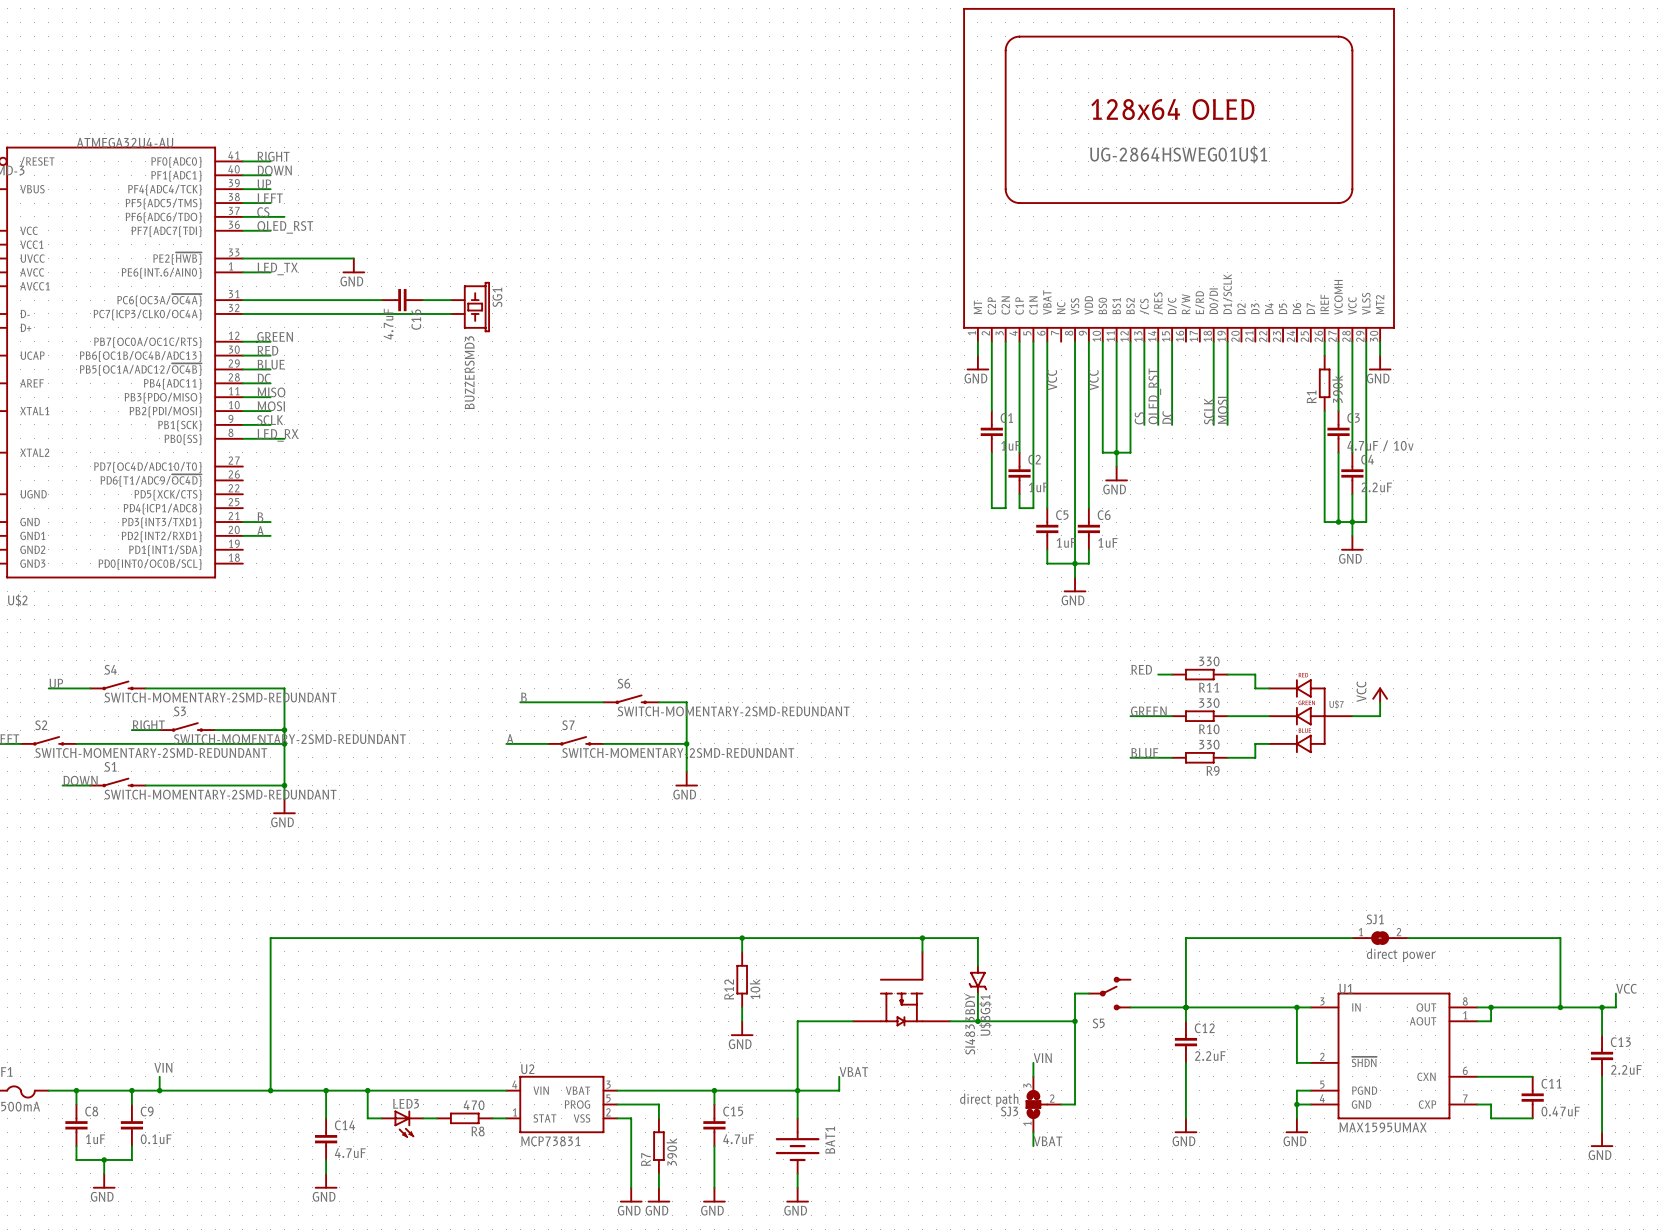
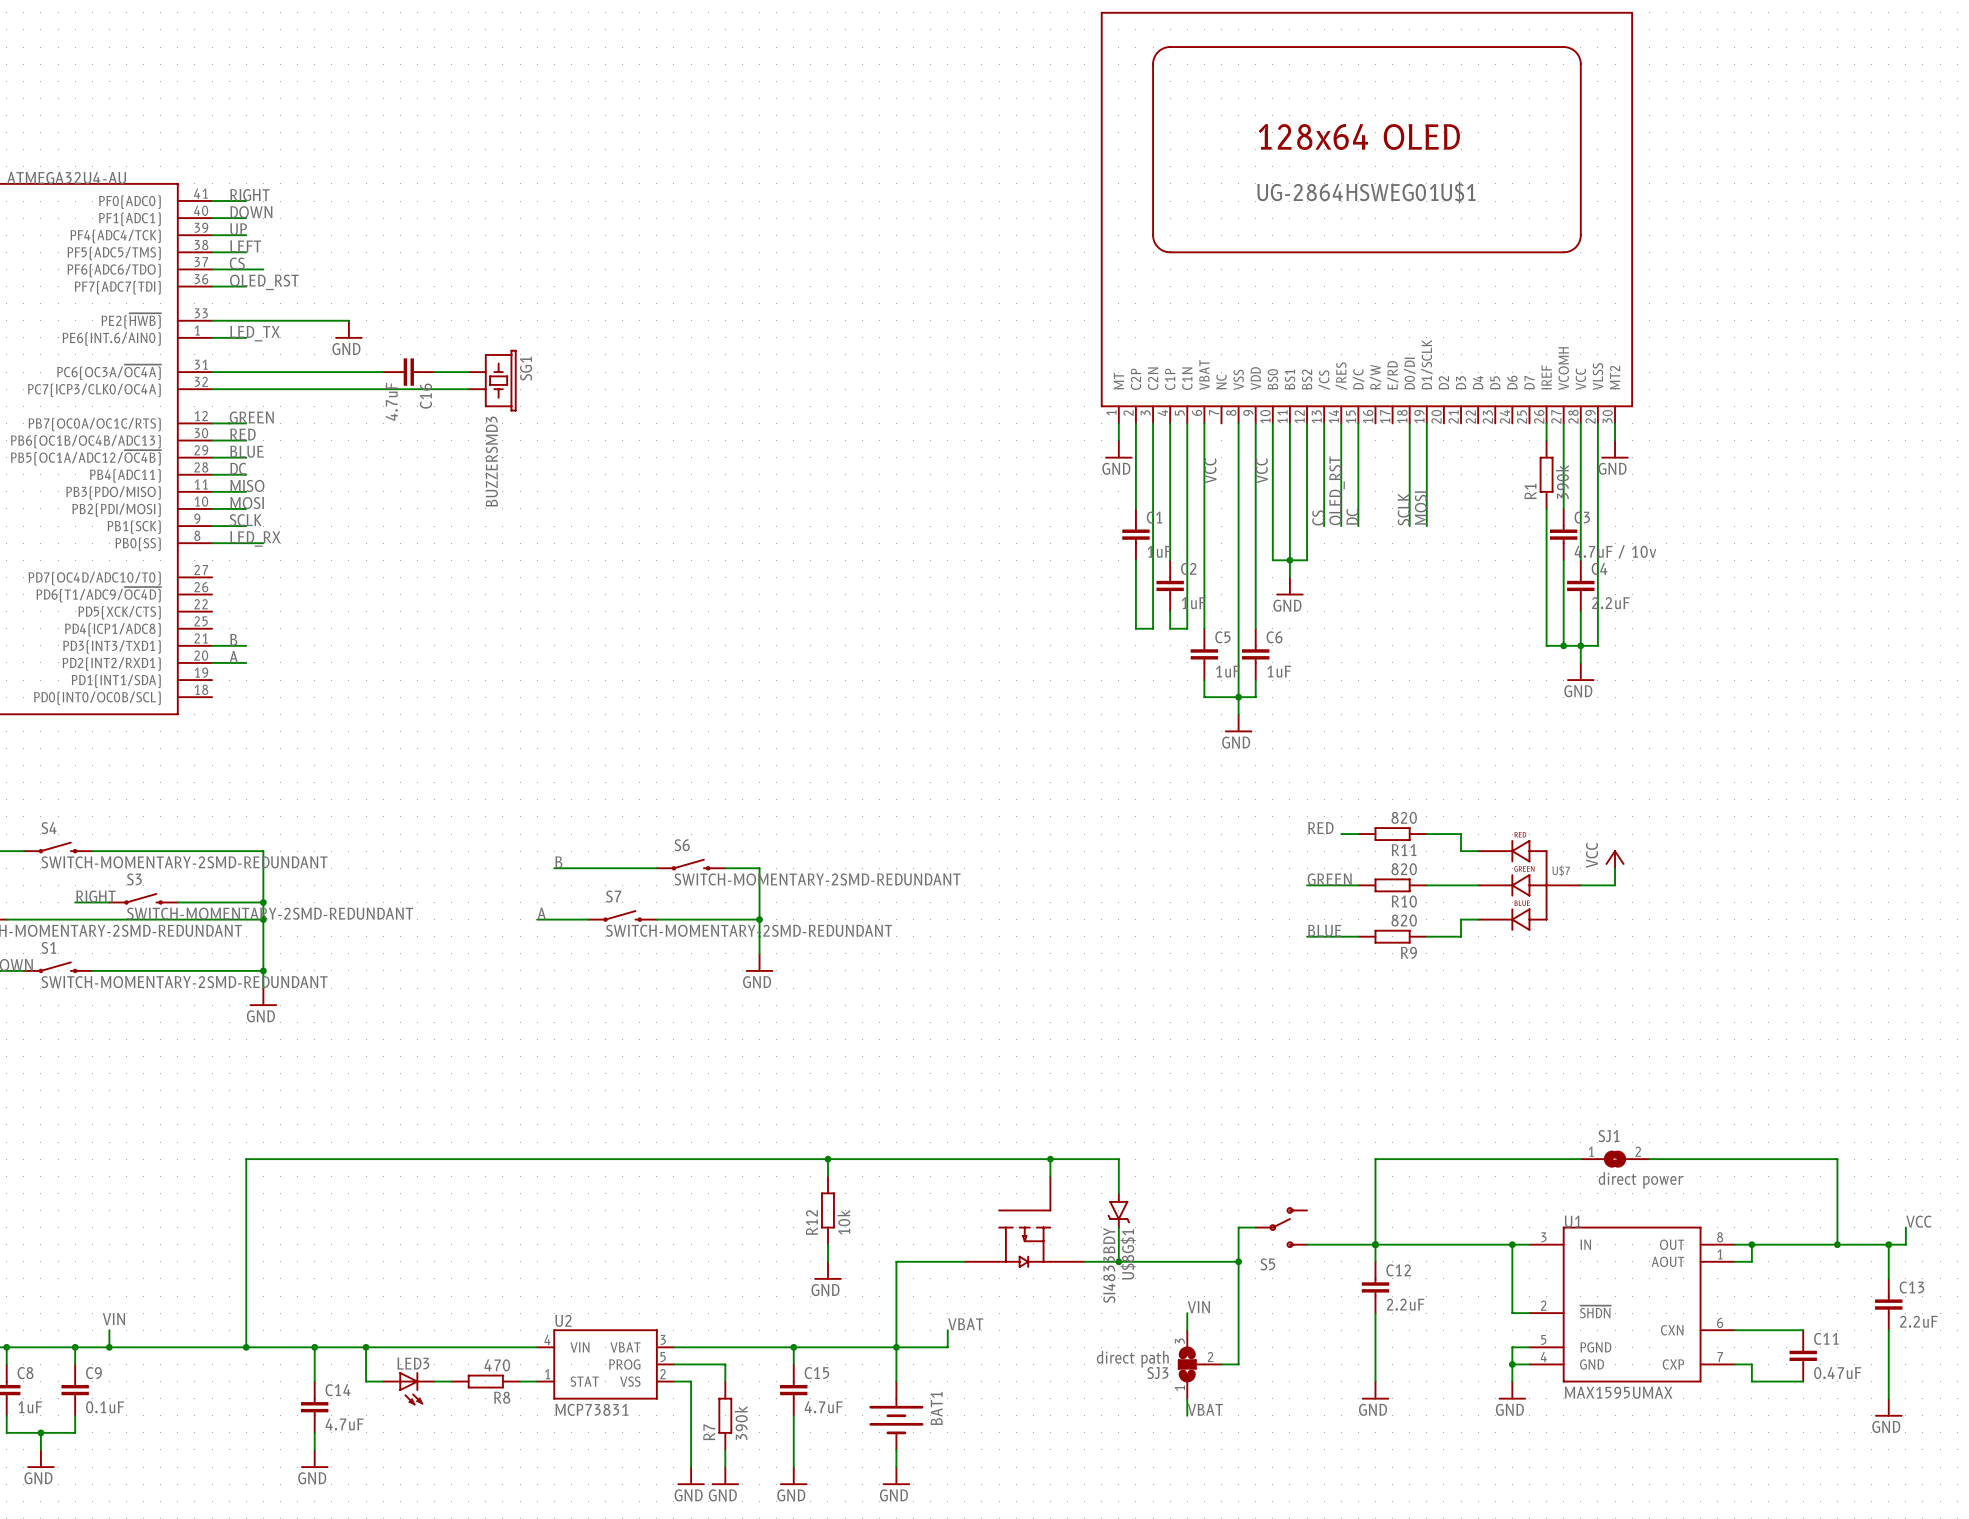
R11 value: 330 (1209, 661) -> 820 (1404, 817)
R10 value: 330 (1209, 703) -> 820 (1404, 869)
R9 value: 330 (1209, 744) -> 820 (1404, 920)

